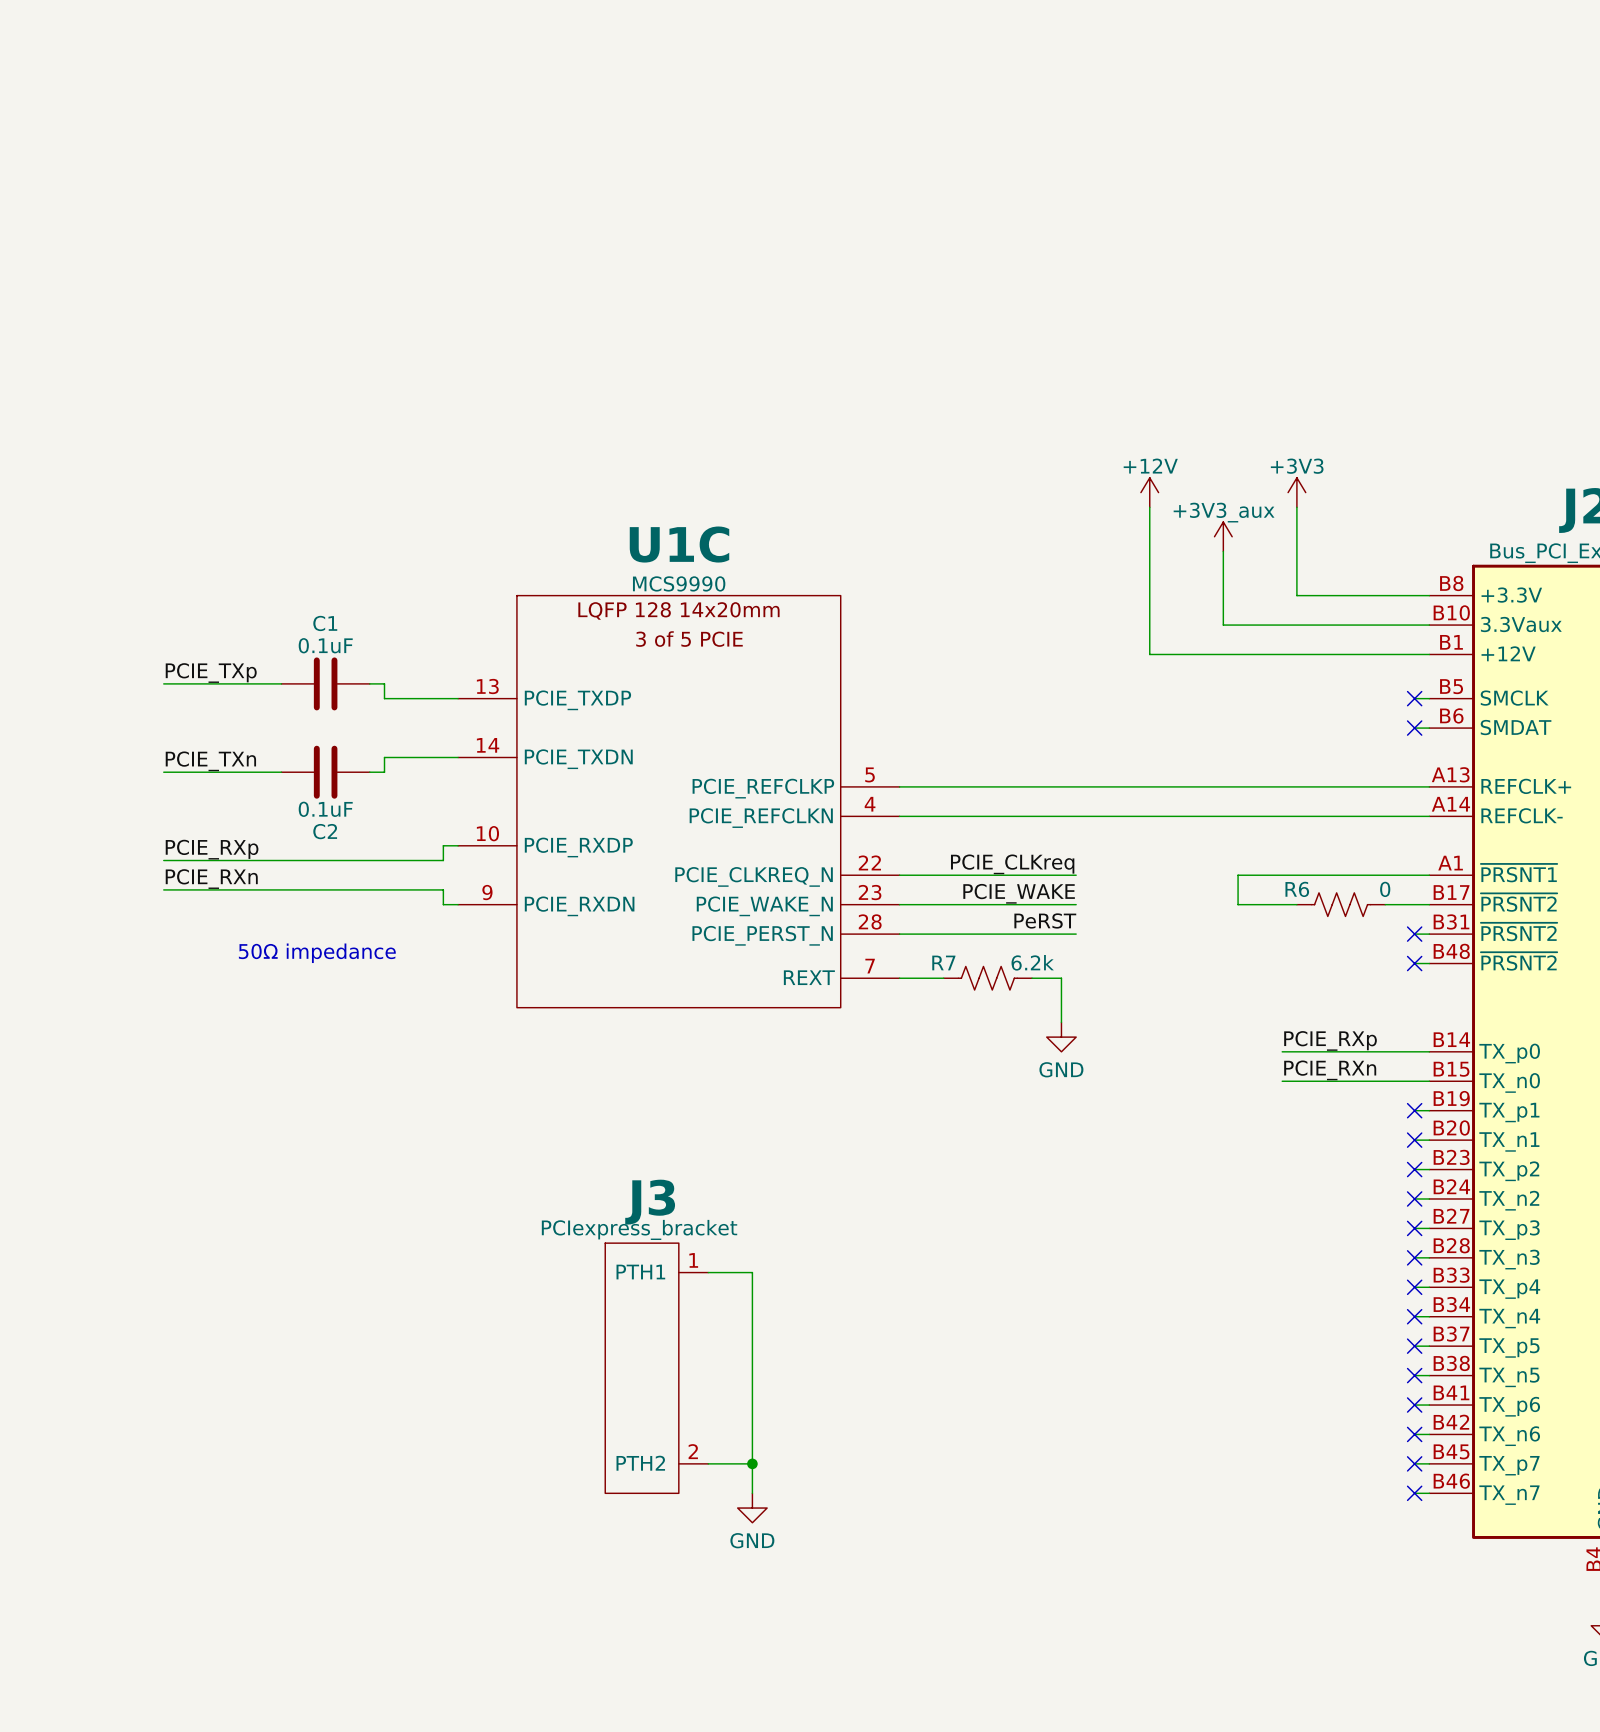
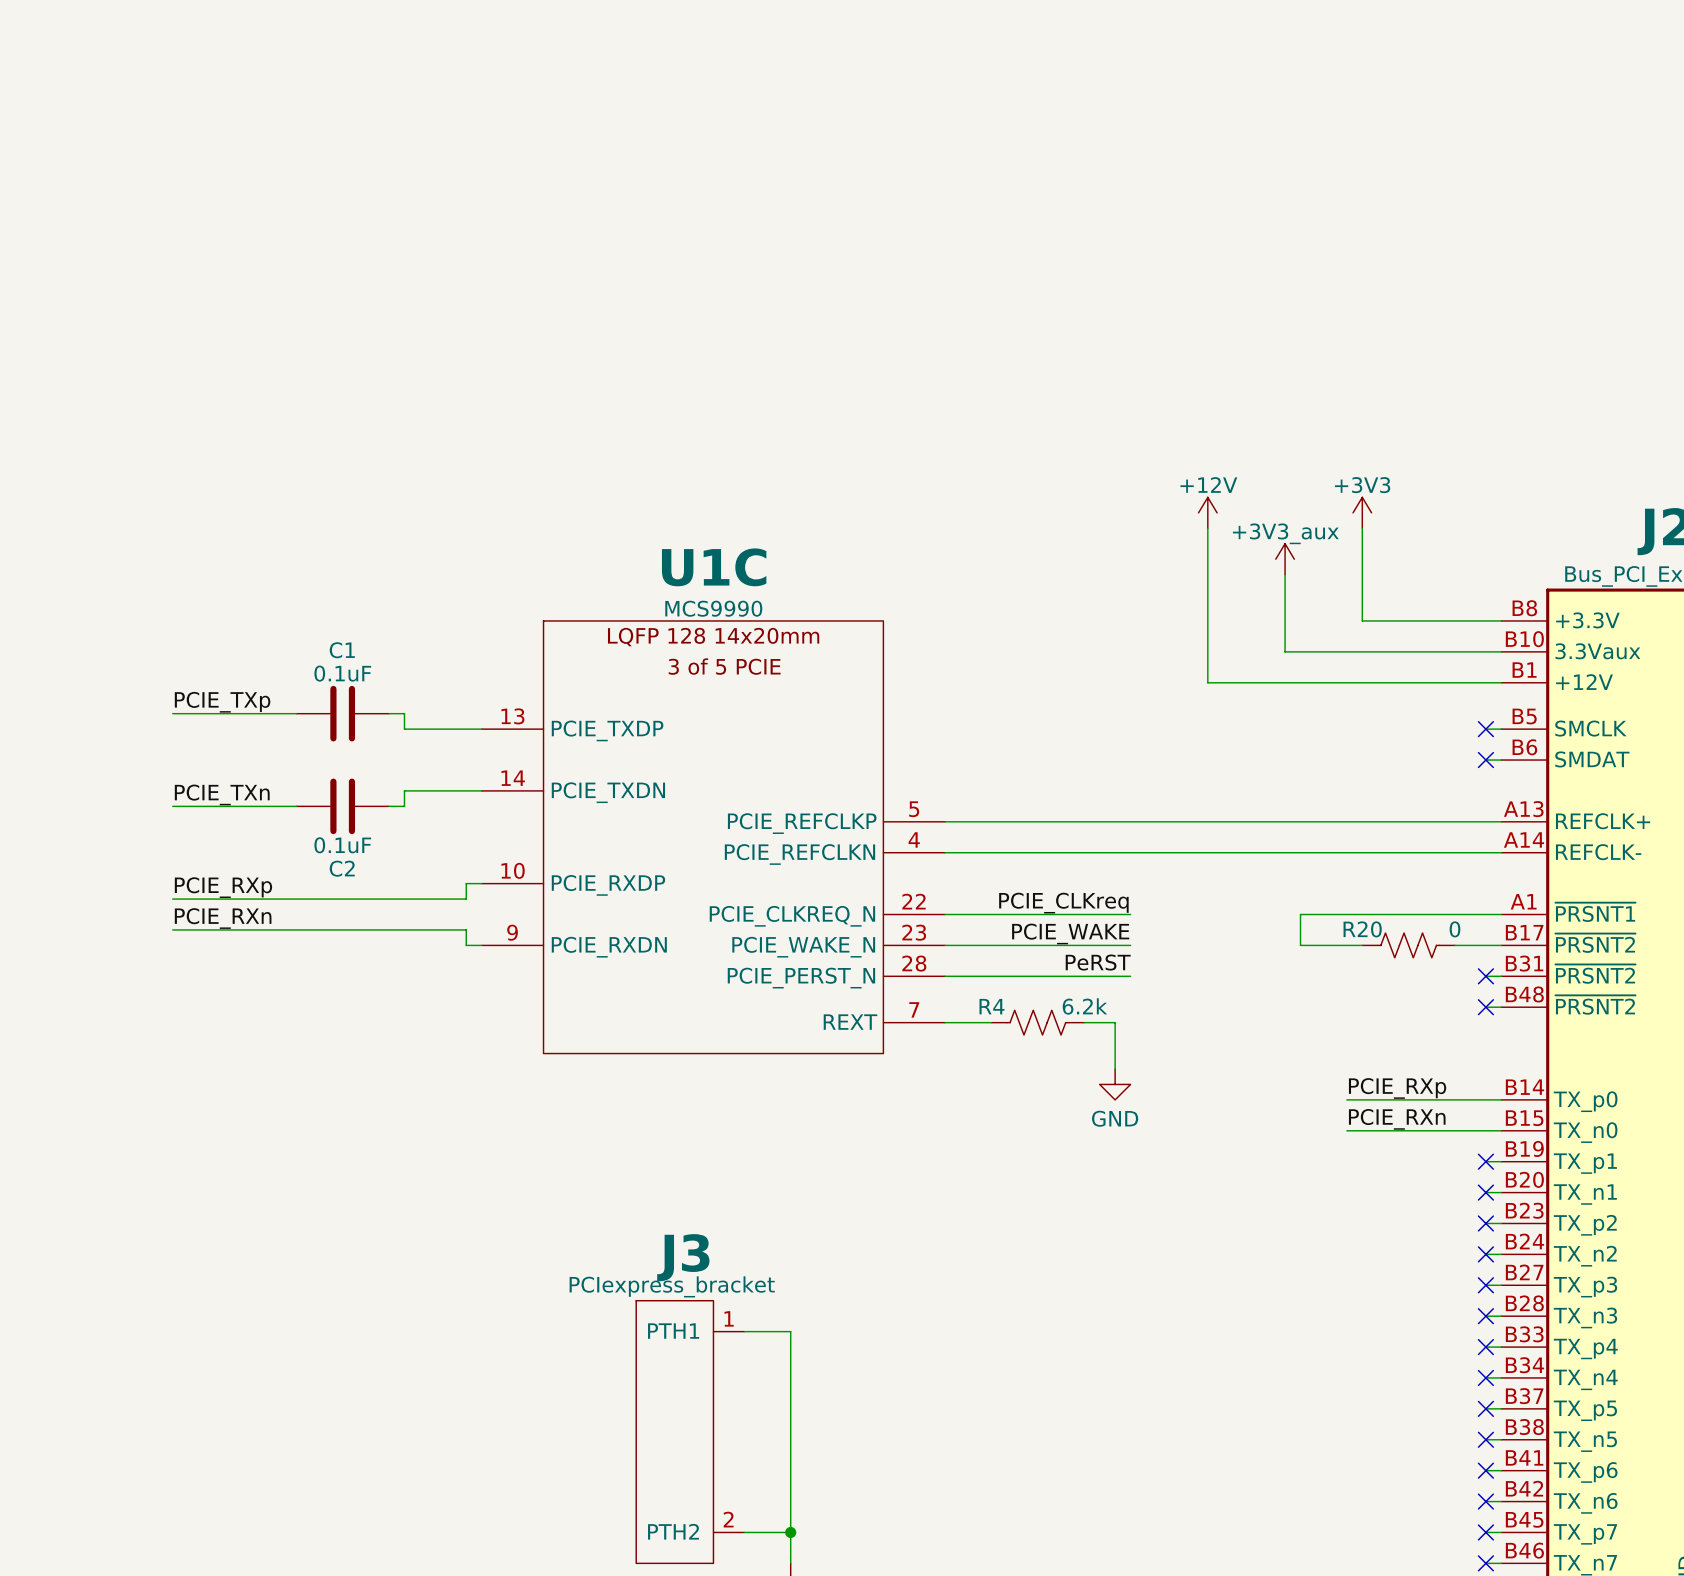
R6 name: R6 (1297, 889) -> R20 (1362, 929)
text: 50Ω impedance (317, 953) -> none
R7 name: R7 (943, 962) -> R4 (991, 1006)

